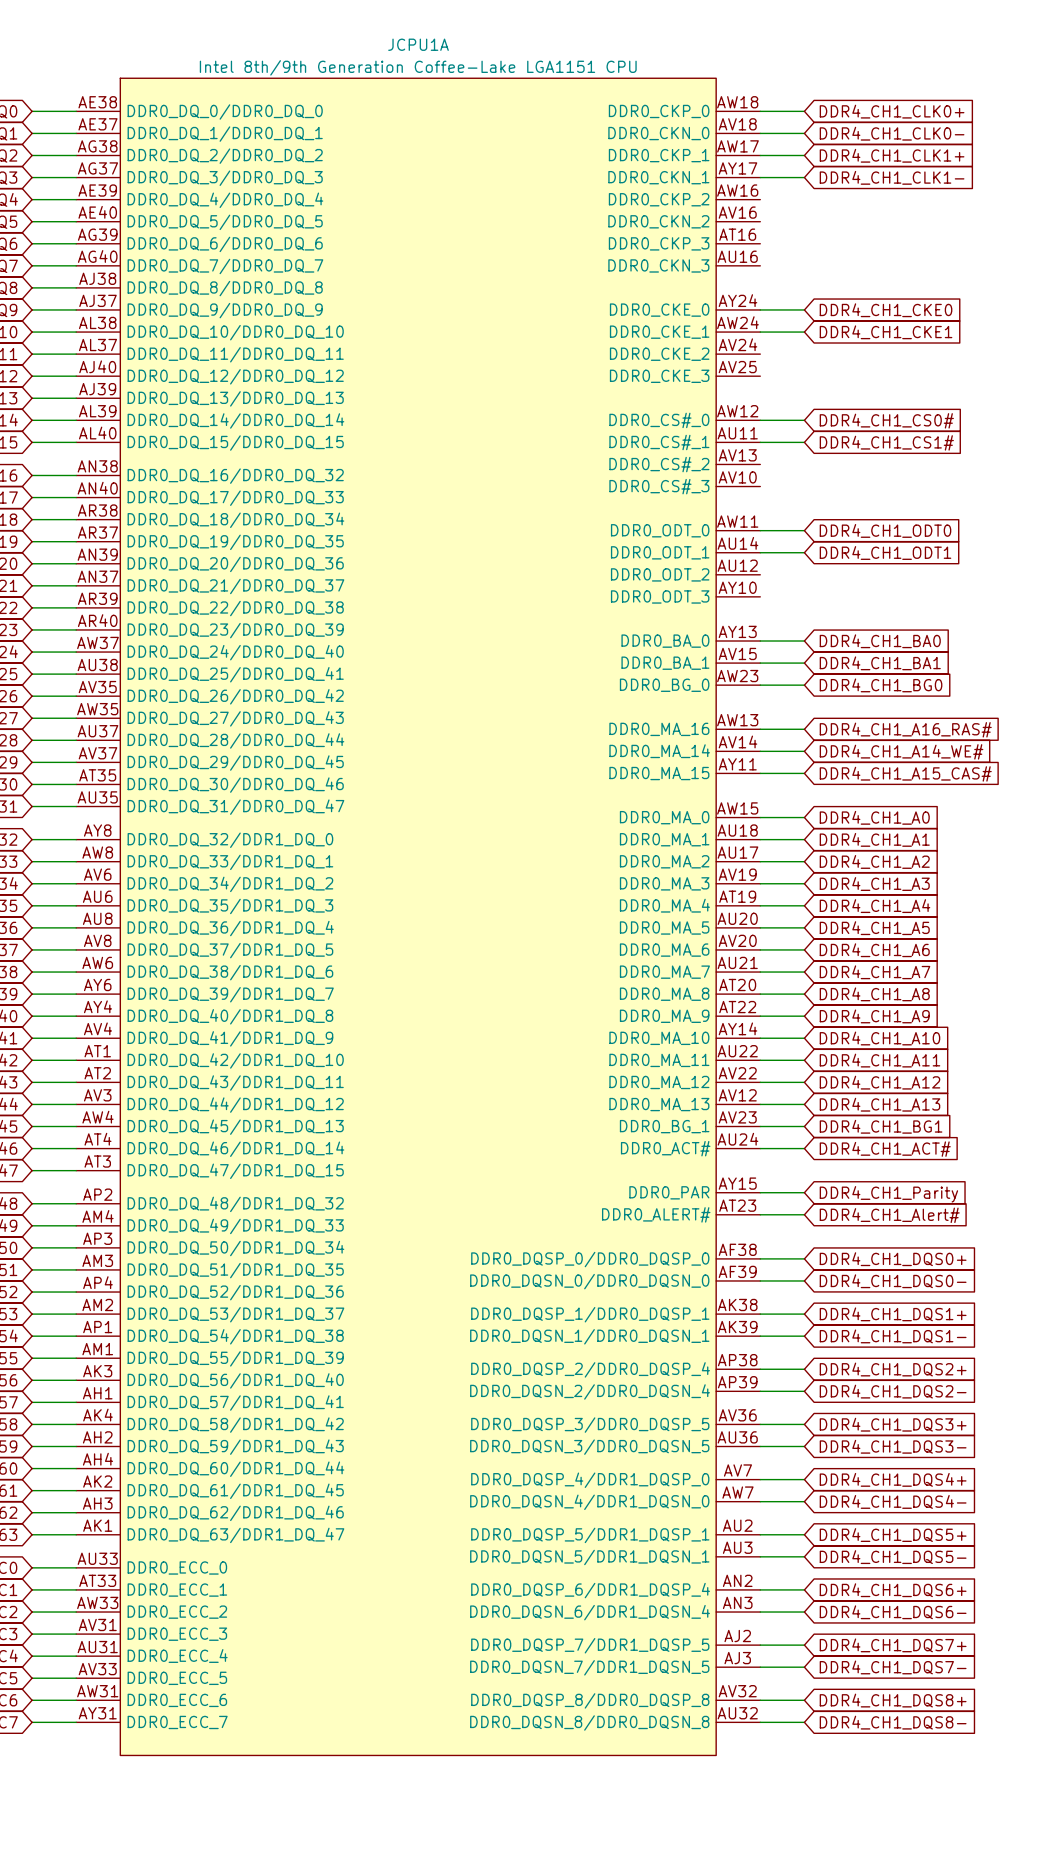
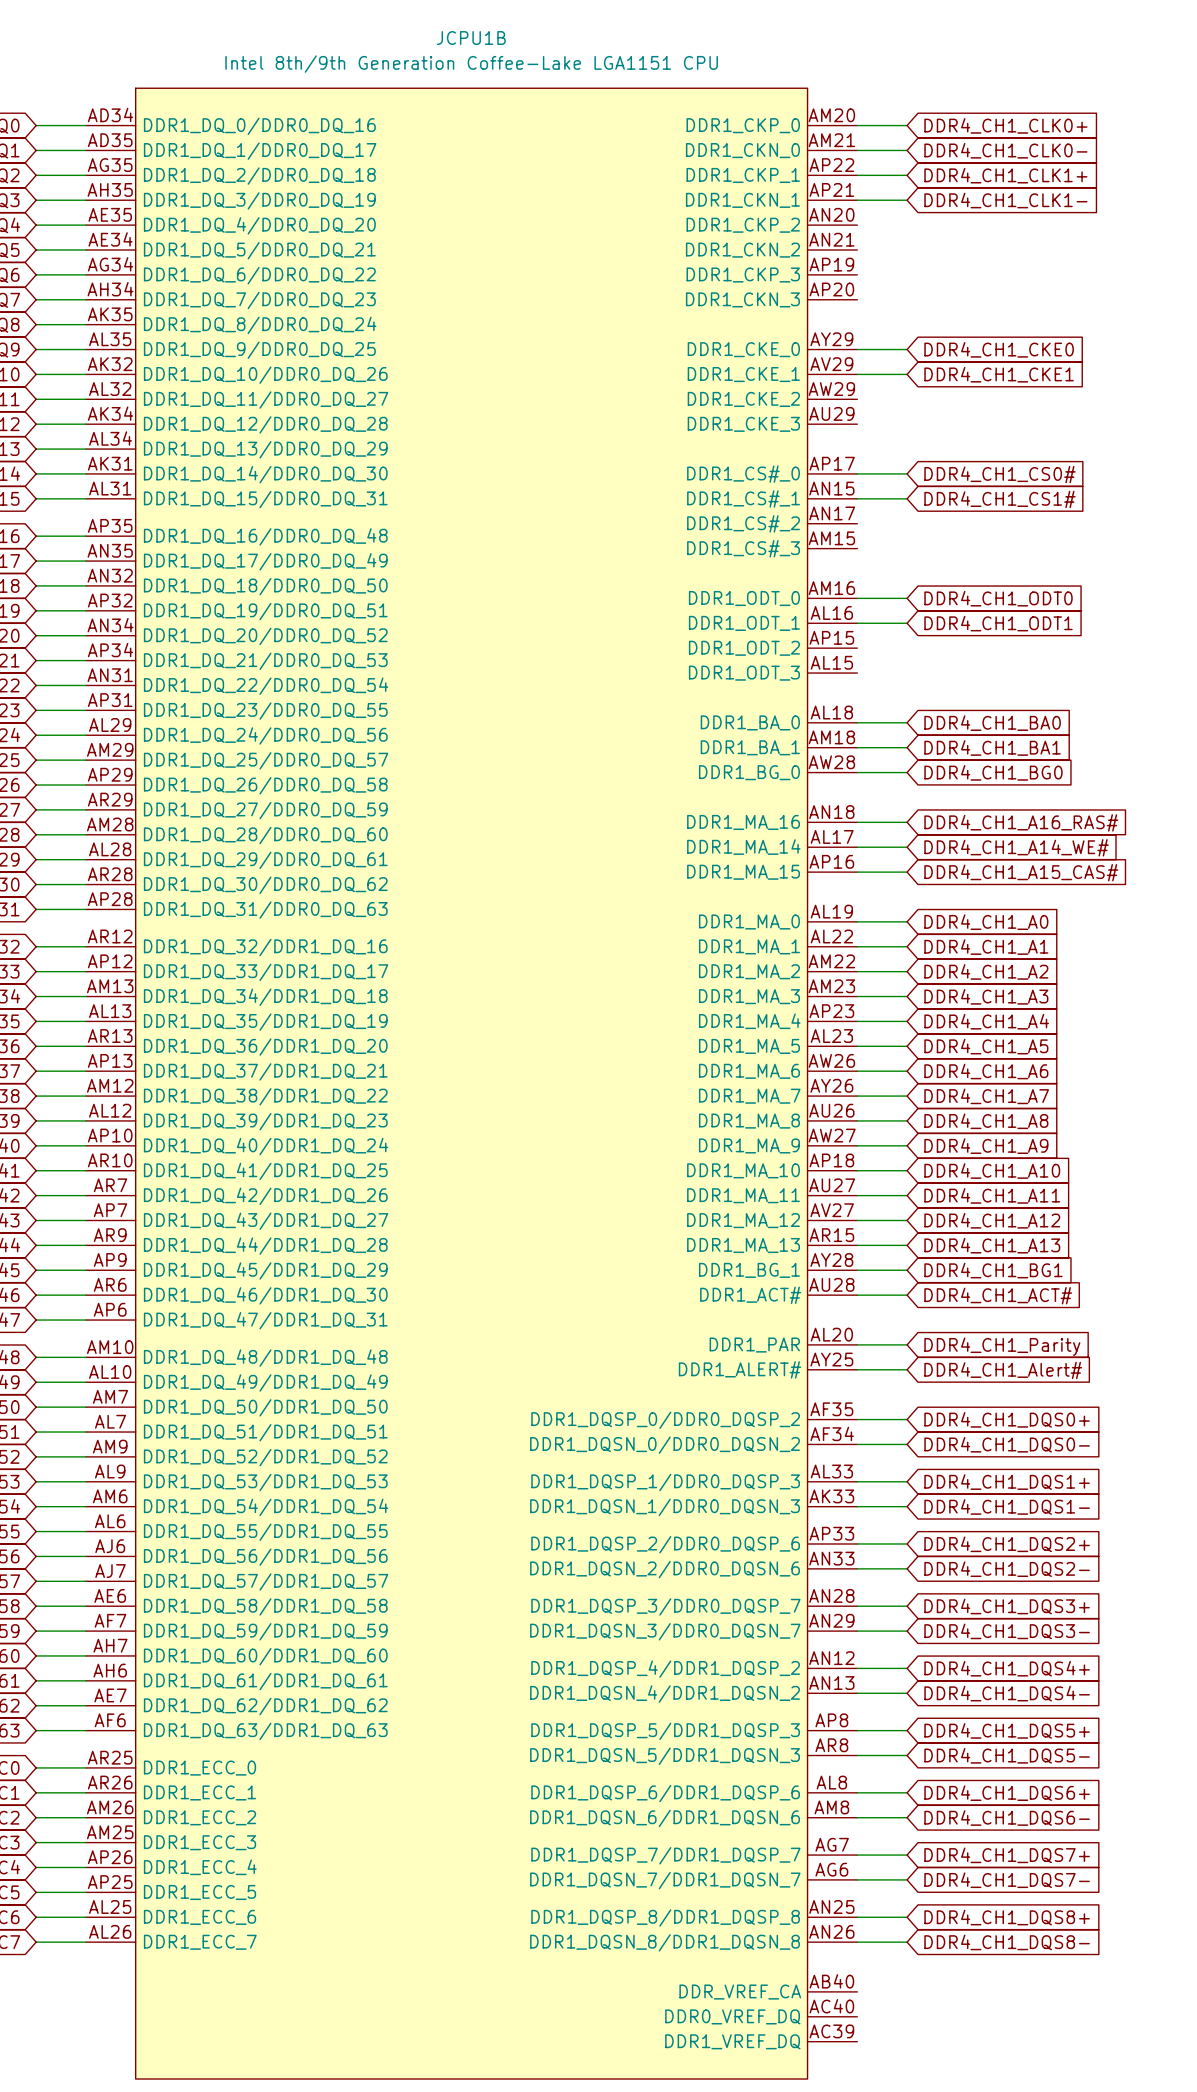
JCPU1A: Intel 8th/9th Generation Coffee-Lake LGA1151 CPU (418, 916) -> none
JCPU1B: none -> Intel 8th/9th Generation Coffee-Lake LGA1151 CPU (471, 1083)

